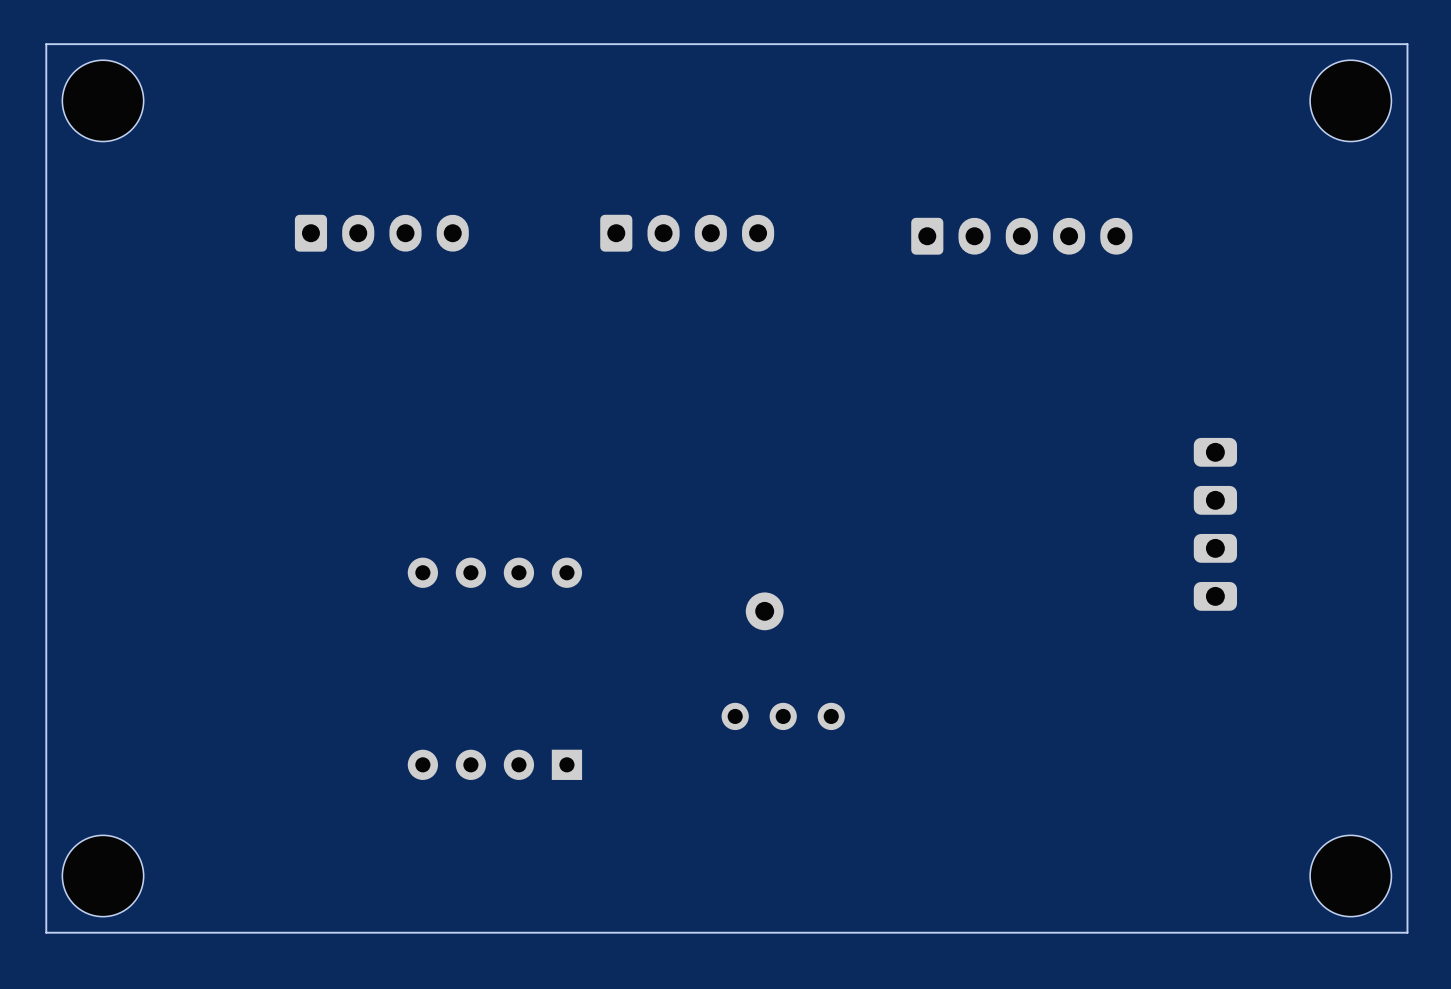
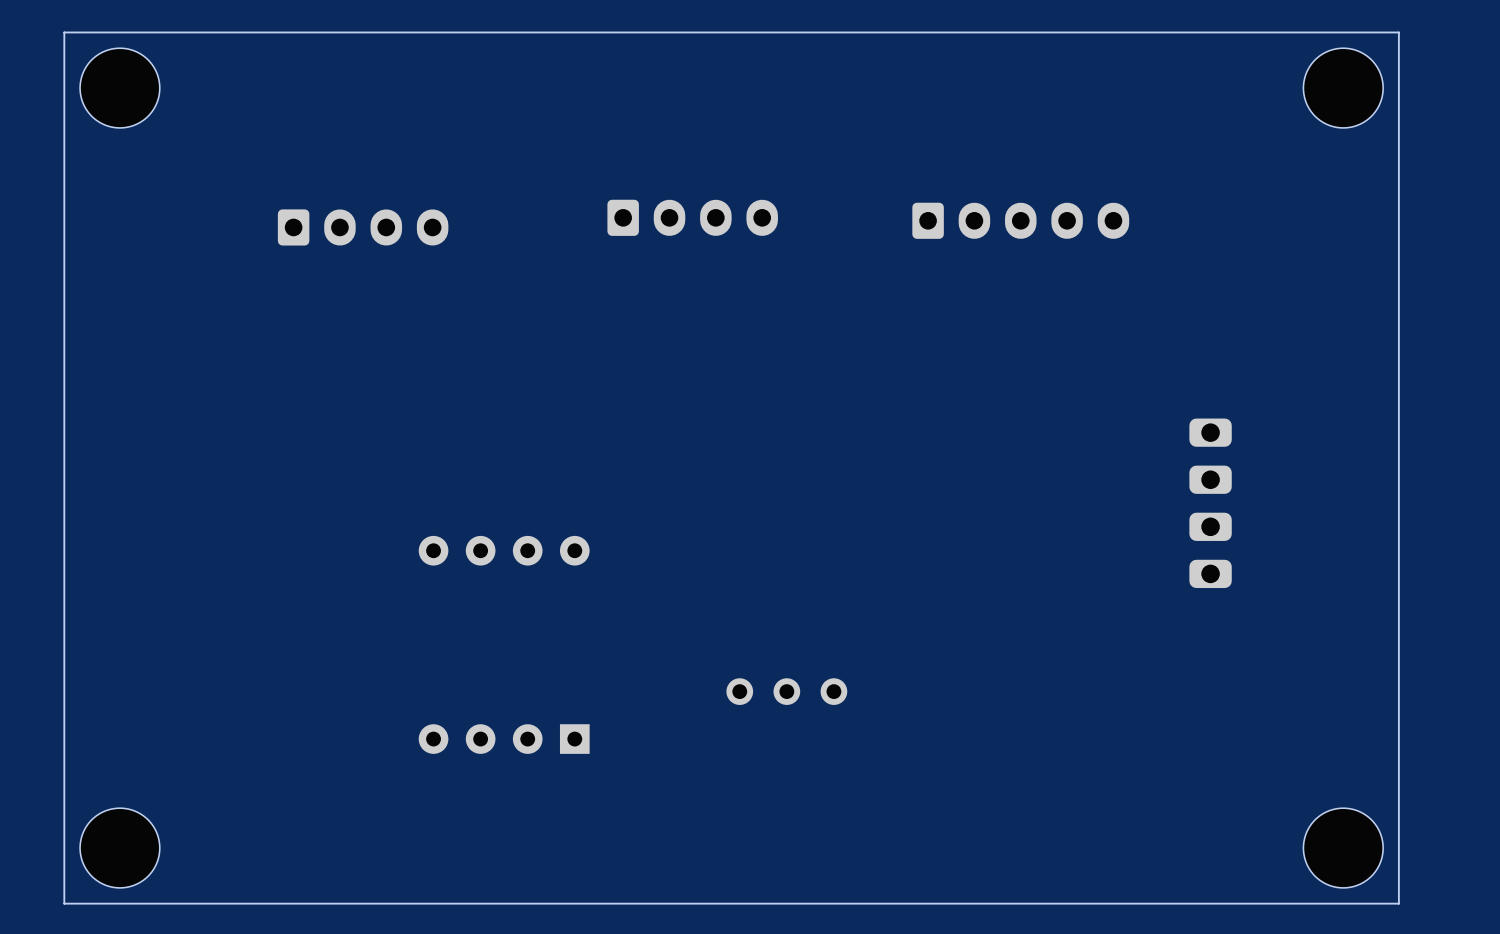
part position: (381, 233) -> (363, 227)
part: (764, 611) -> none

